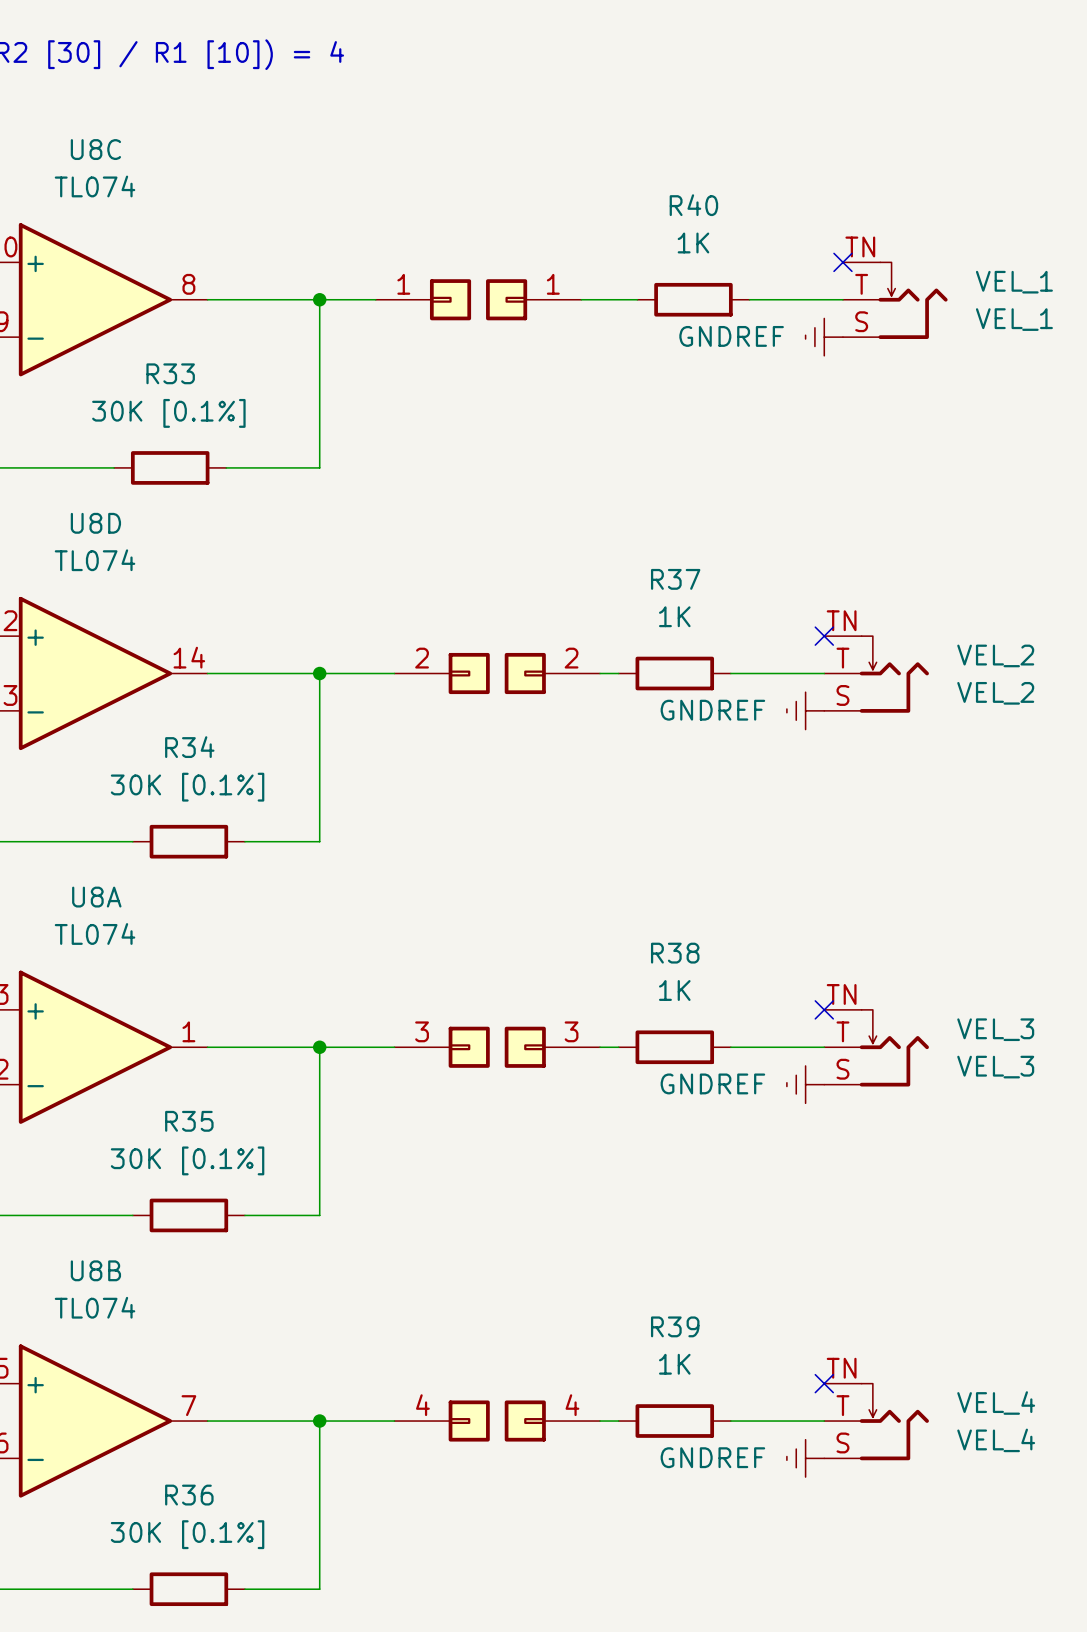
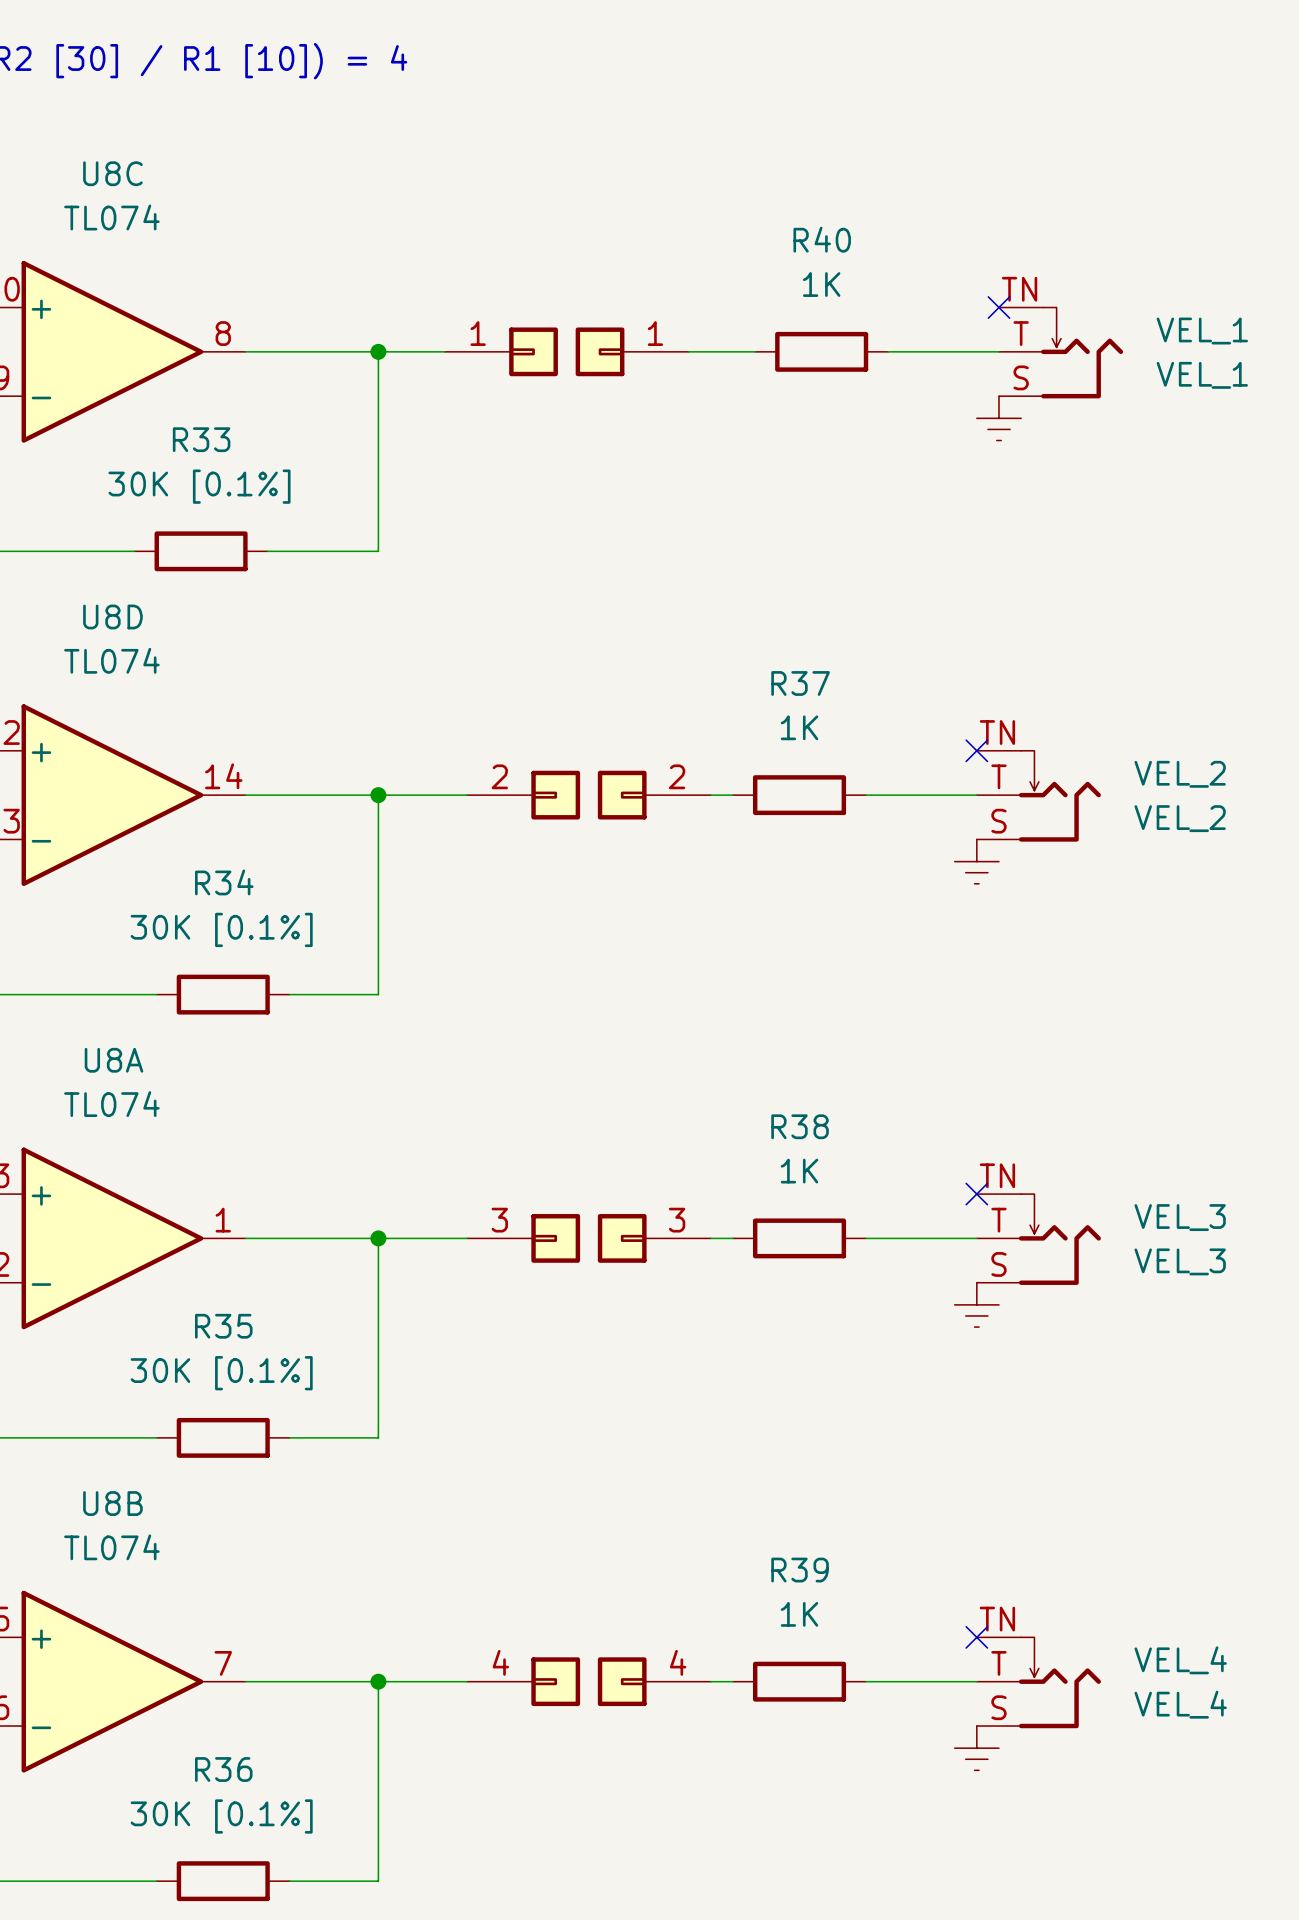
power symbol: GNDREF (824, 337) -> none
power symbol: none -> (998, 418)
power symbol: GNDREF (805, 710) -> none
power symbol: none -> (976, 861)
power symbol: GNDREF (805, 1084) -> none
power symbol: none -> (976, 1304)
power symbol: GNDREF (805, 1458) -> none
power symbol: none -> (976, 1748)

